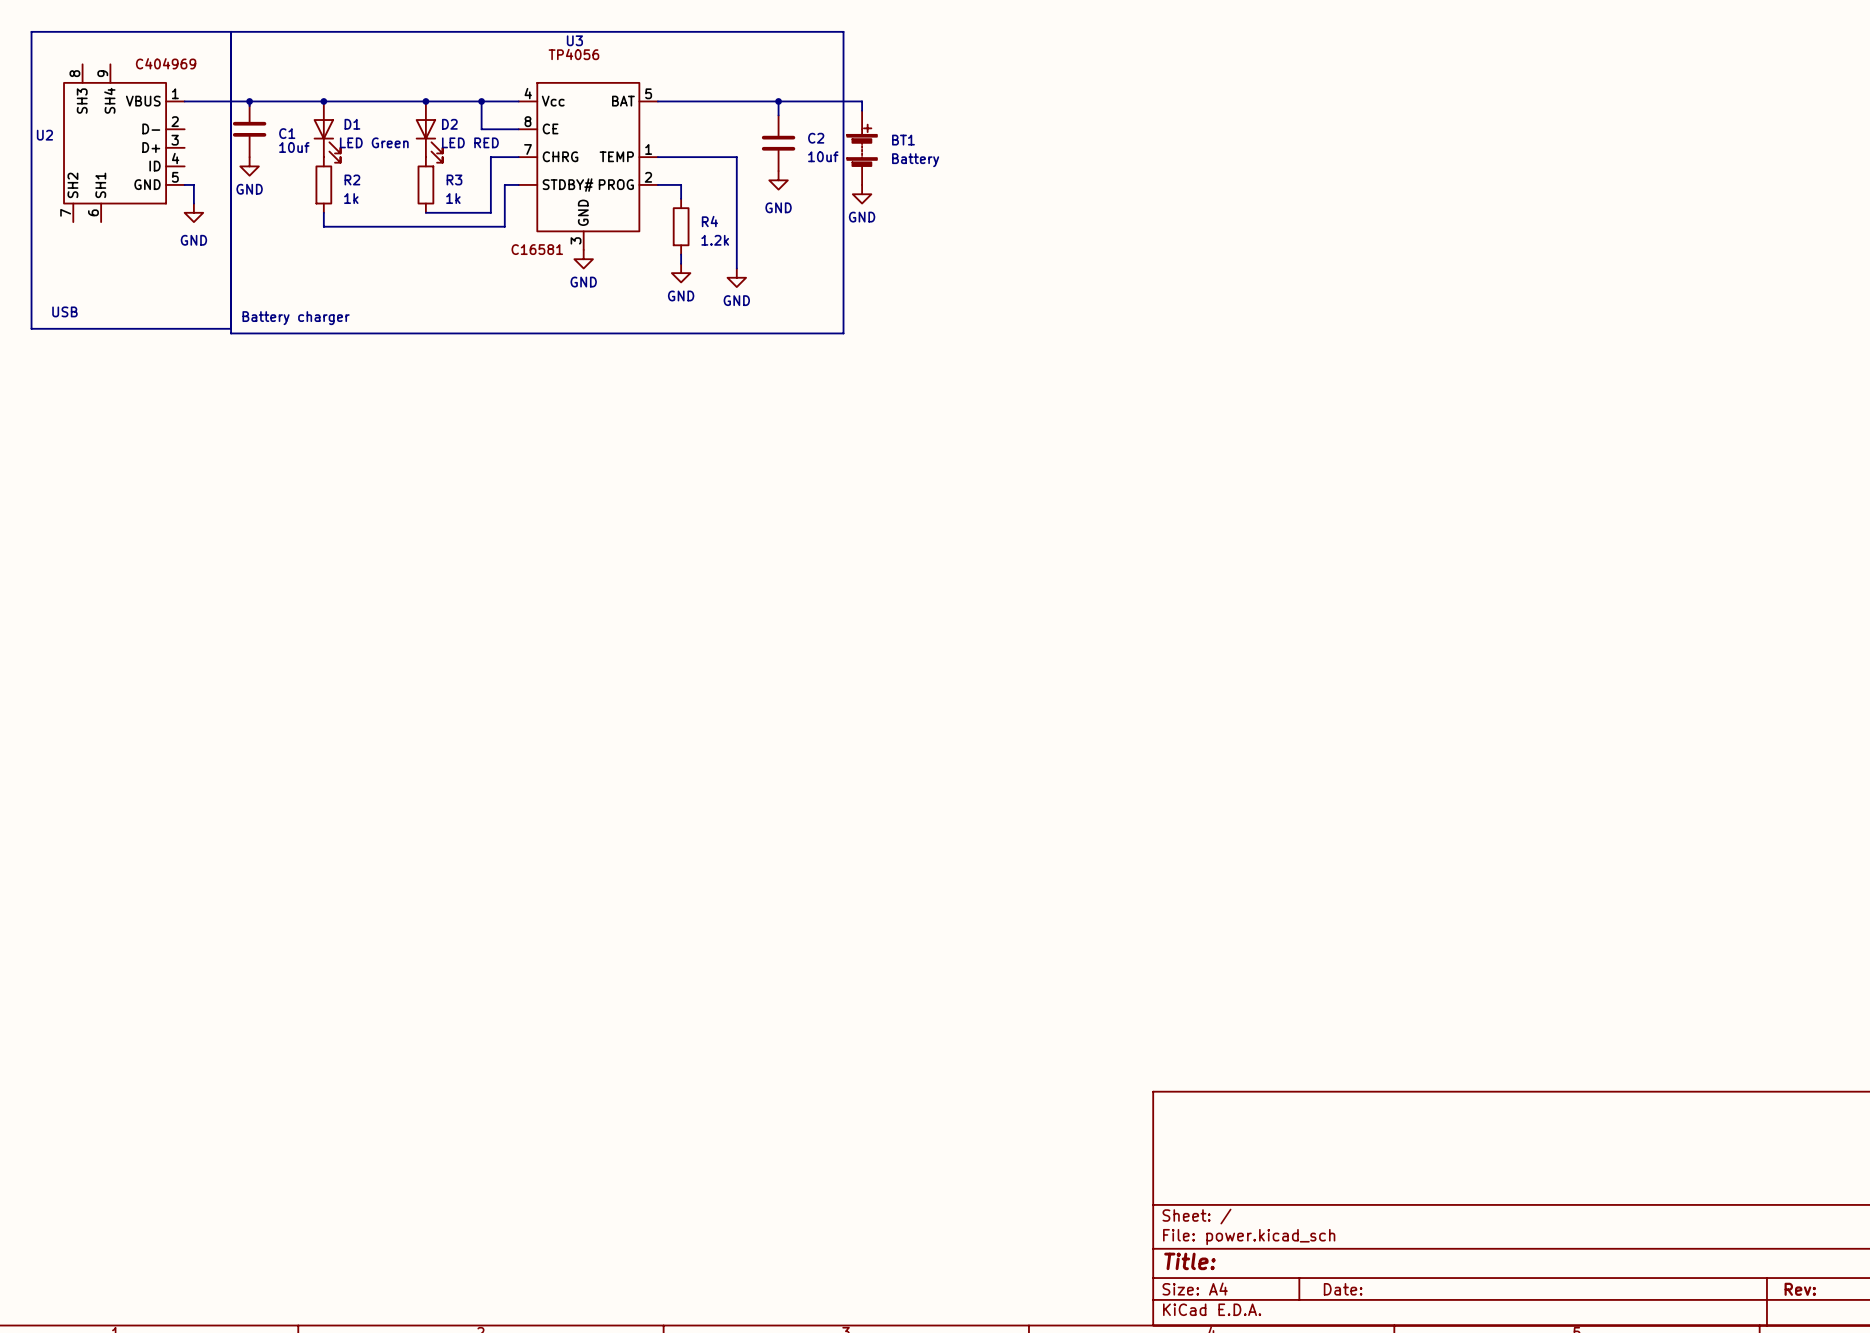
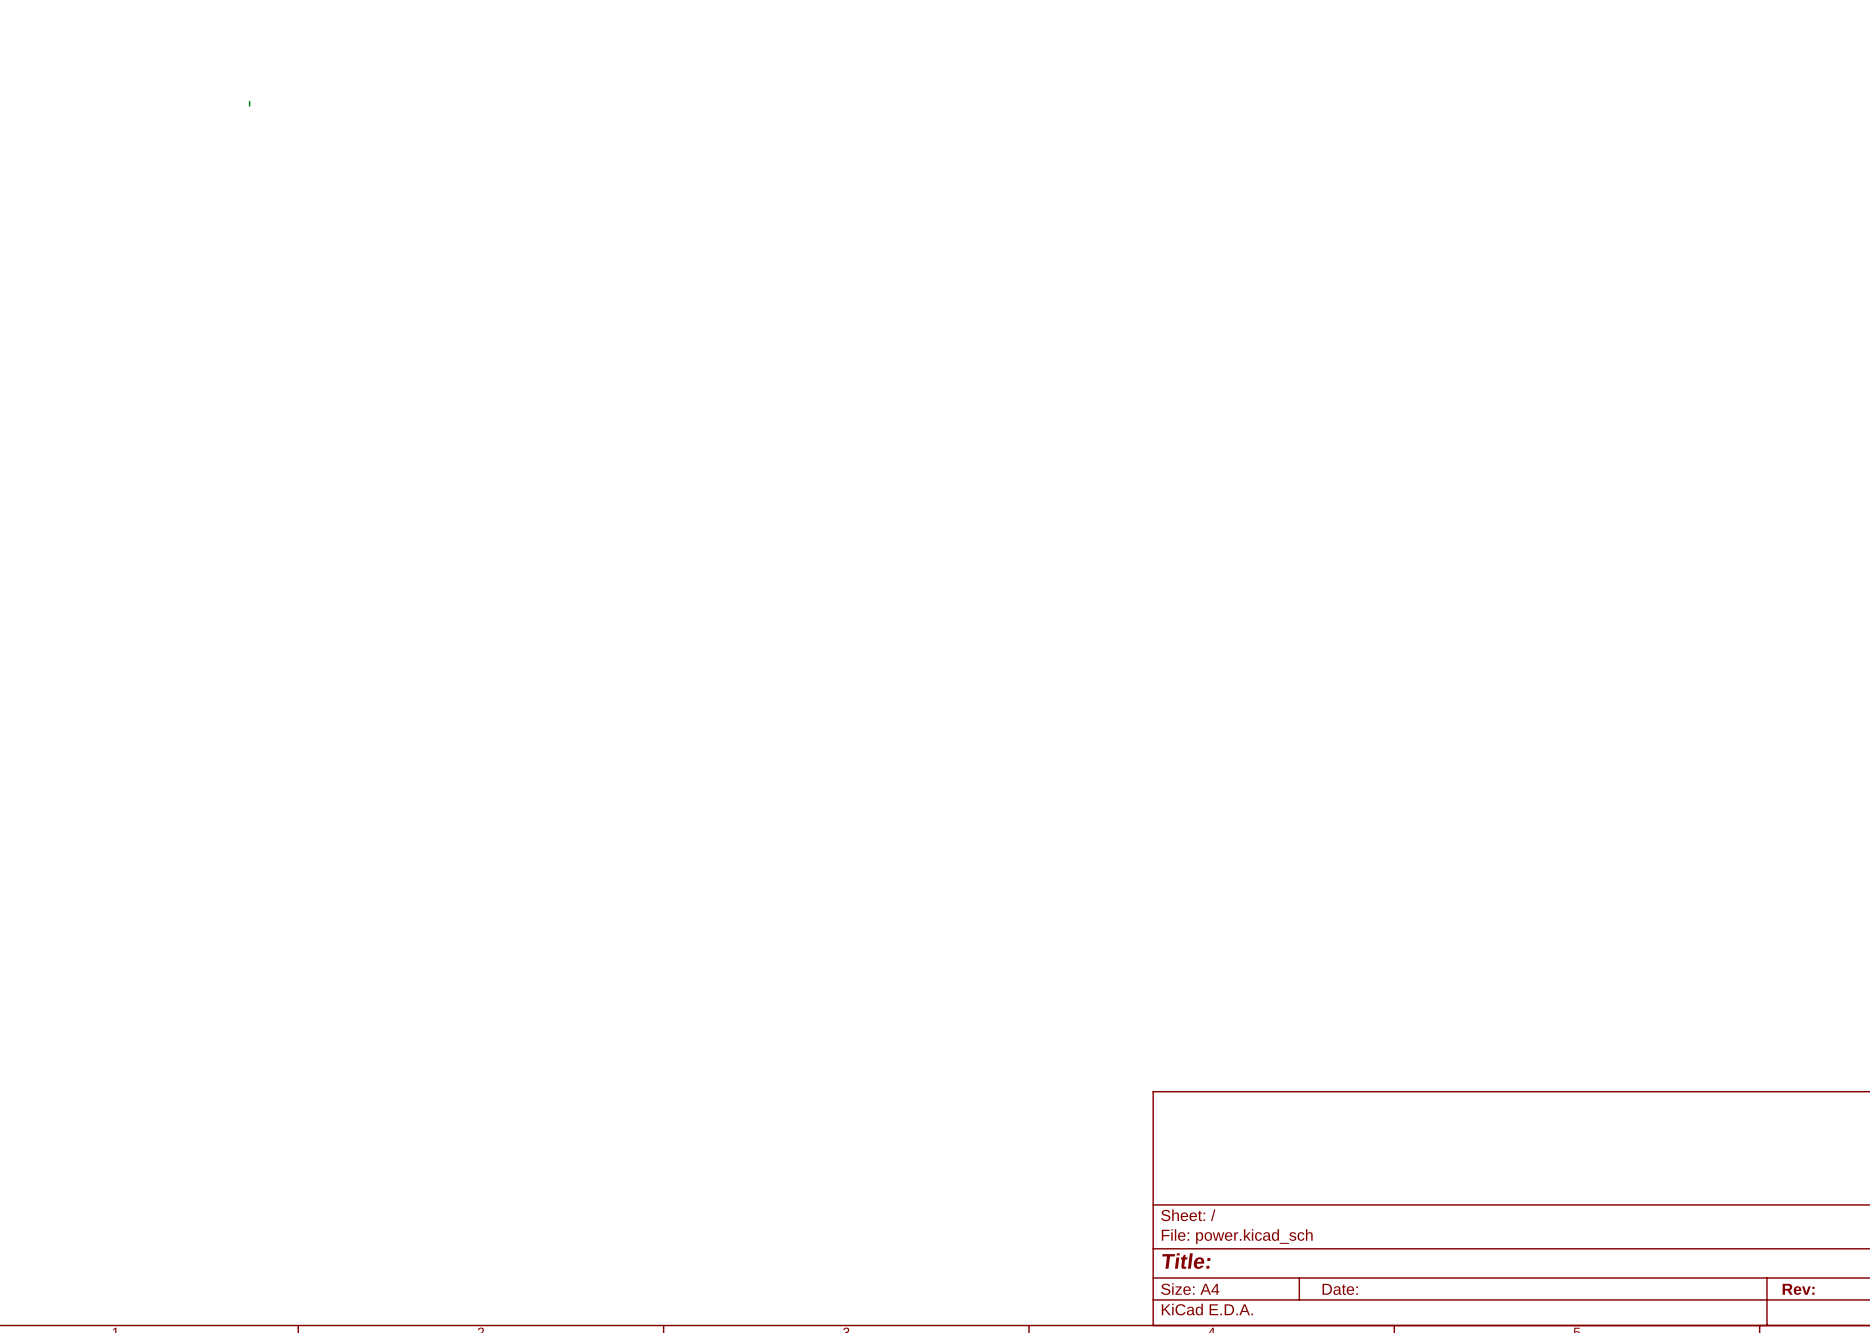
line: (231, 31) (231, 333) (843, 333) (843, 31) (31, 31) (31, 328) (231, 328) -> none
wire: (184, 101) (518, 101) -> none
junction: (249, 101) -> none
junction: (323, 101) -> none
junction: (425, 101) -> none
wire: (481, 101) (481, 129) (518, 129) -> none
junction: (481, 101) -> none
wire: (657, 101) (862, 101) (862, 110) -> none
wire: (778, 101) (778, 115) -> none
junction: (778, 101) -> none
C1: 10uf (249, 129) -> none
D1: LED Green (327, 132) -> none
D2: LED RED (429, 132) -> none
U2: (124, 143) -> none
C2: 10uf (778, 143) -> none
BT1: Battery (862, 147) -> none
wire: (518, 157) (490, 157) (490, 212) (425, 212) -> none
wire: (657, 157) (736, 157) (736, 268) -> none
power symbol: GND (249, 166) -> none
U3: (588, 166) -> none
power symbol: GND (778, 180) -> none
wire: (184, 184) (193, 184) (193, 203) -> none
R2: 1k (323, 184) -> none
R3: 1k (425, 184) -> none
wire: (518, 184) (504, 184) (504, 226) (323, 226) (323, 212) -> none
wire: (657, 184) (681, 184) (681, 198) -> none
power symbol: GND (862, 194) -> none
power symbol: GND (193, 212) -> none
R4: 1.2k (681, 226) -> none
wire: (681, 254) (681, 263) -> none
power symbol: GND (583, 259) -> none
power symbol: GND (681, 273) -> none
power symbol: GND (736, 277) -> none
text: USB (64, 311) -> none
text: Battery charger (296, 318) -> none

